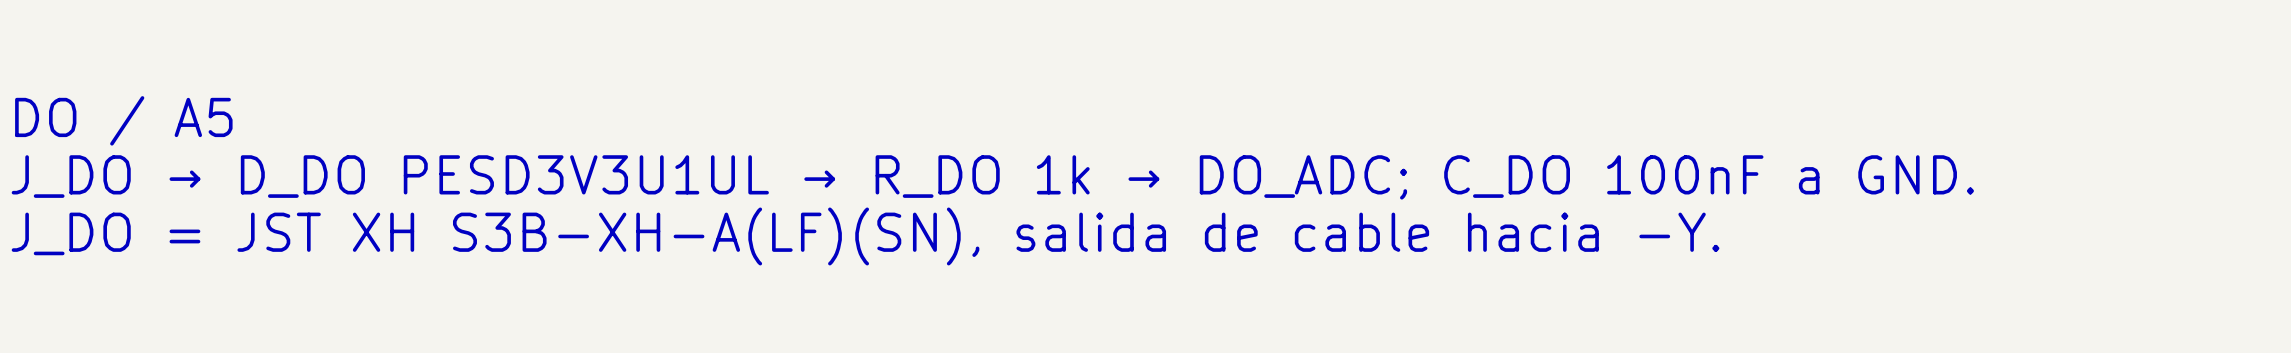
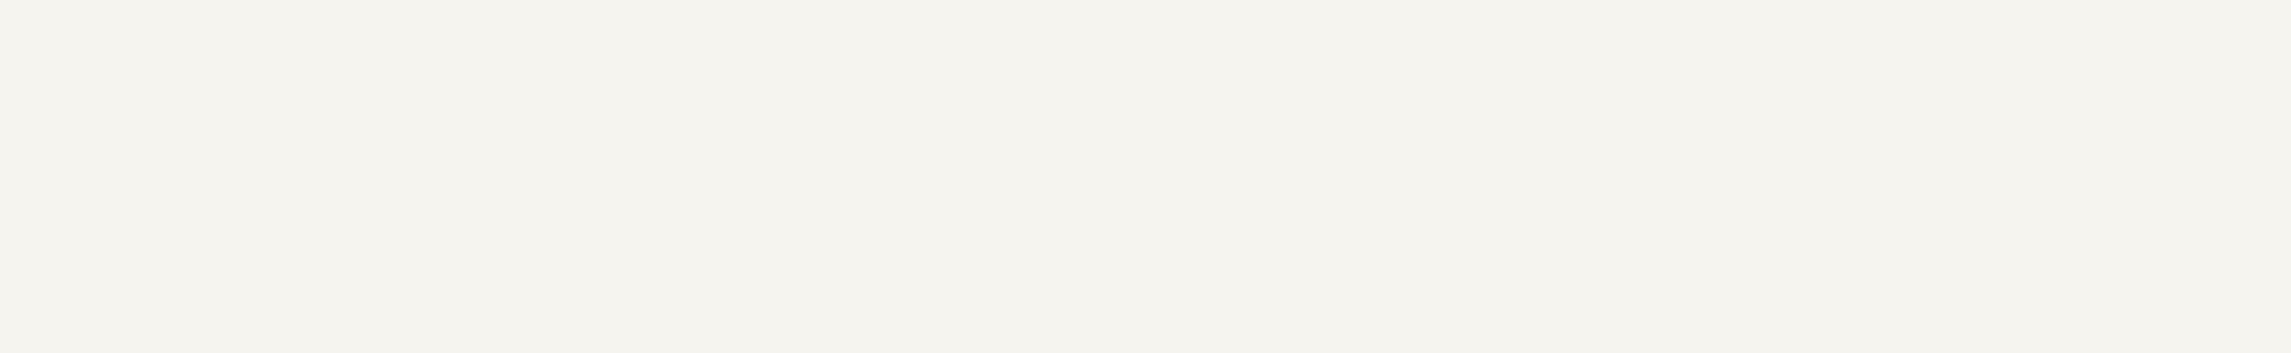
text: DO / A5 (123, 120) -> none
text: J_DO → D_DO PESD3V3U1UL → R_DO 1k → DO_ADC; C_DO 100nF a GND. (992, 177) -> none
text: J_DO = JST XH S3B-XH-A(LF)(SN), salida de cable hacia -Y. (865, 236) -> none

